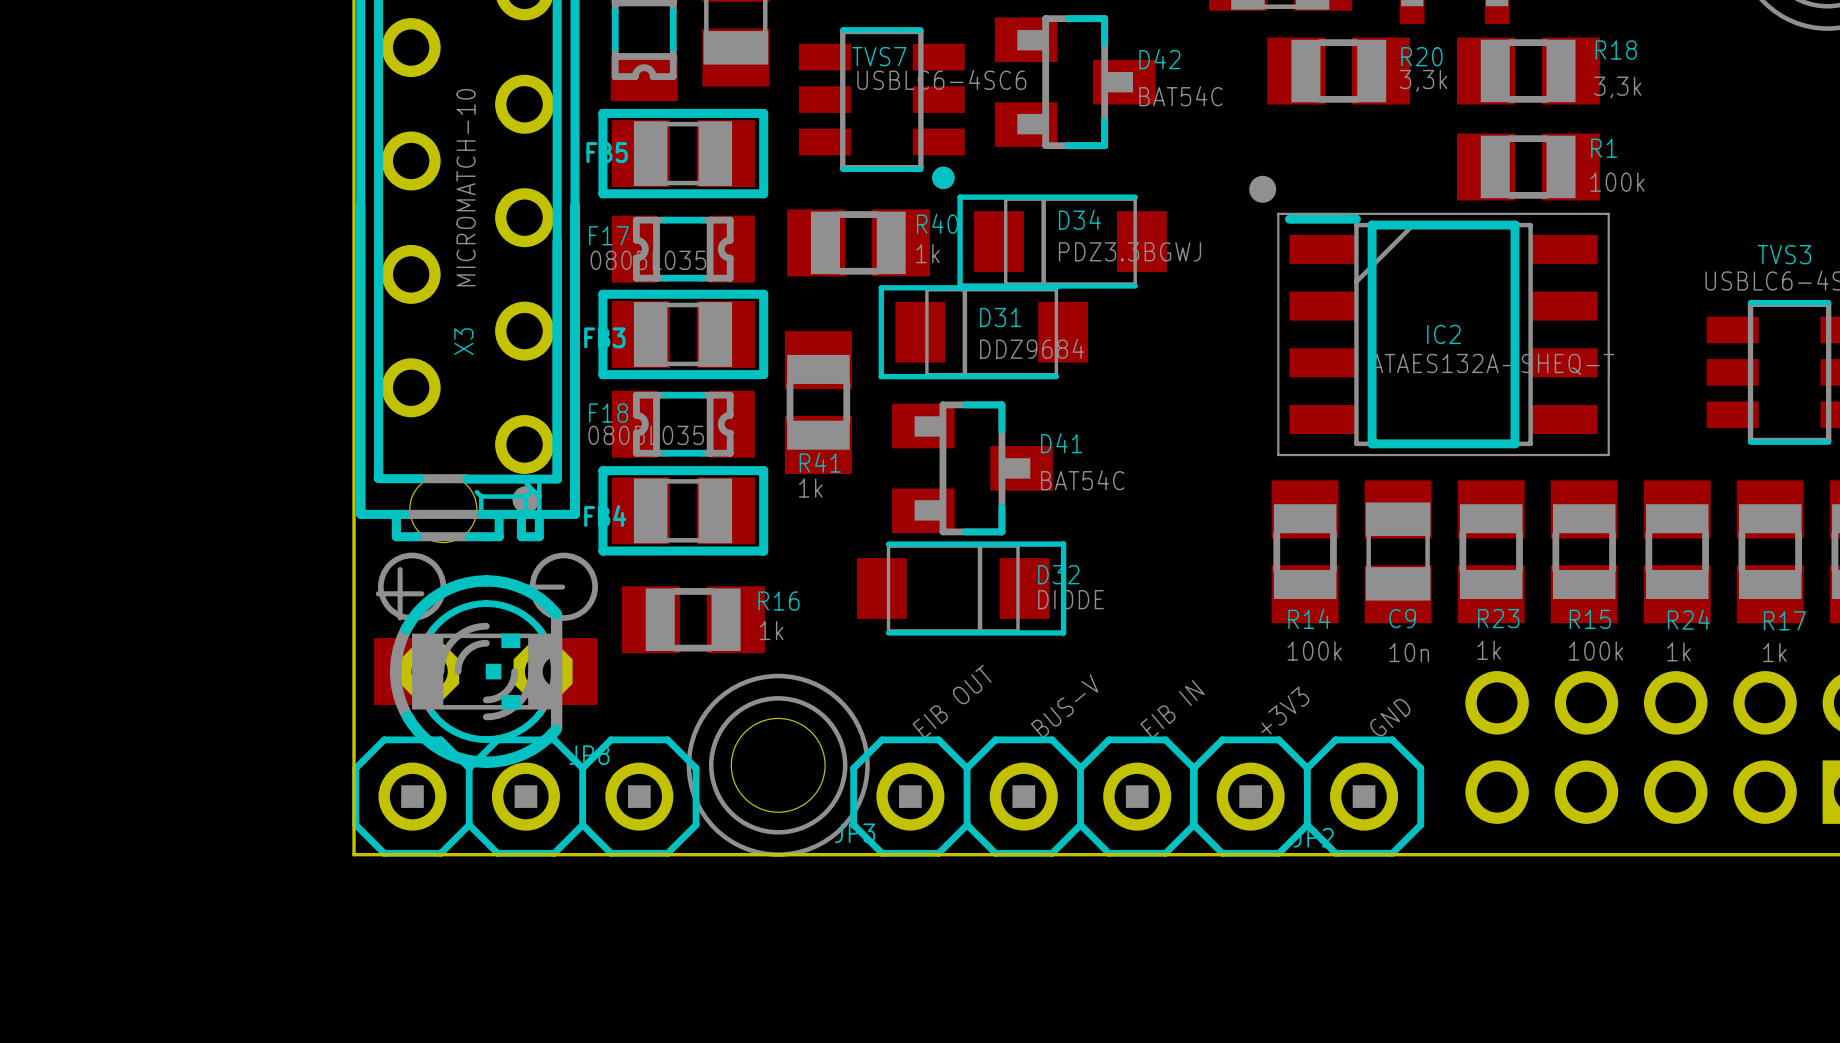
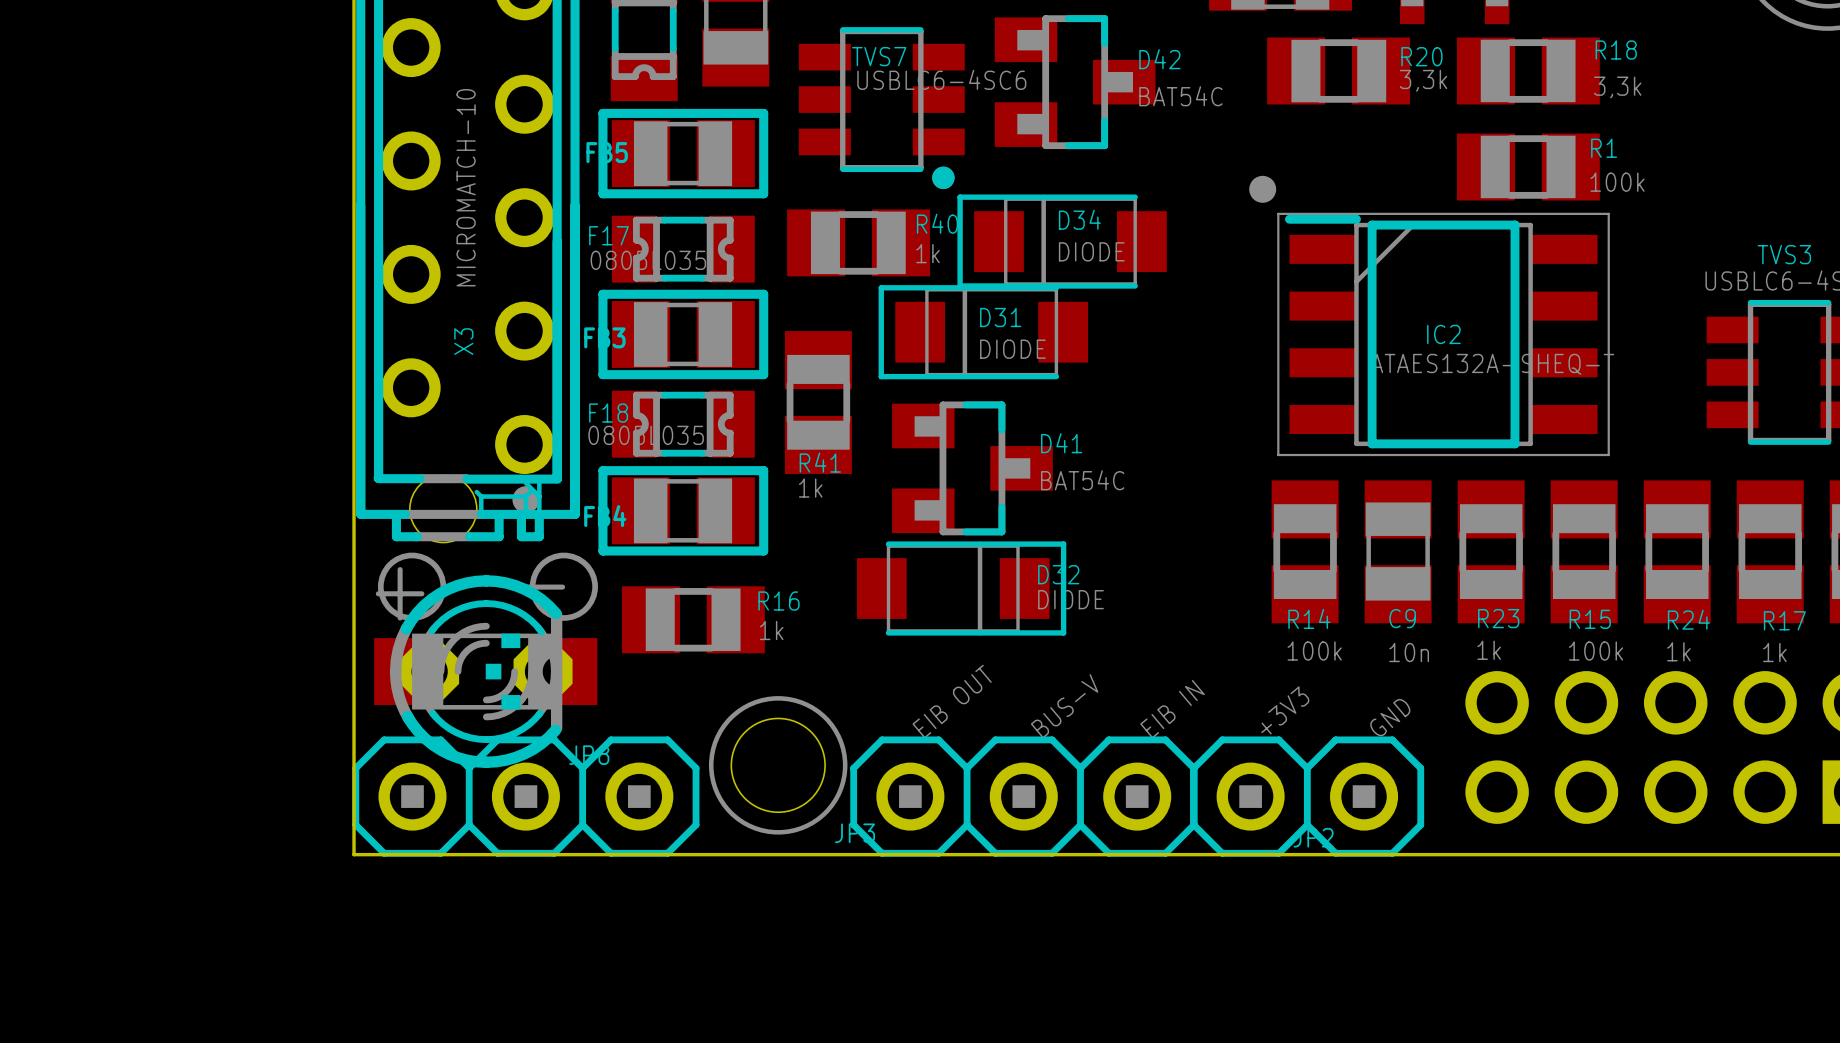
D34 value: PDZ3.3BGWJ (1130, 251) -> DIODE (1091, 251)
D31 value: DDZ9684 (1032, 348) -> DIODE (1012, 349)
drawing: [686, 673, 870, 857] -> none

